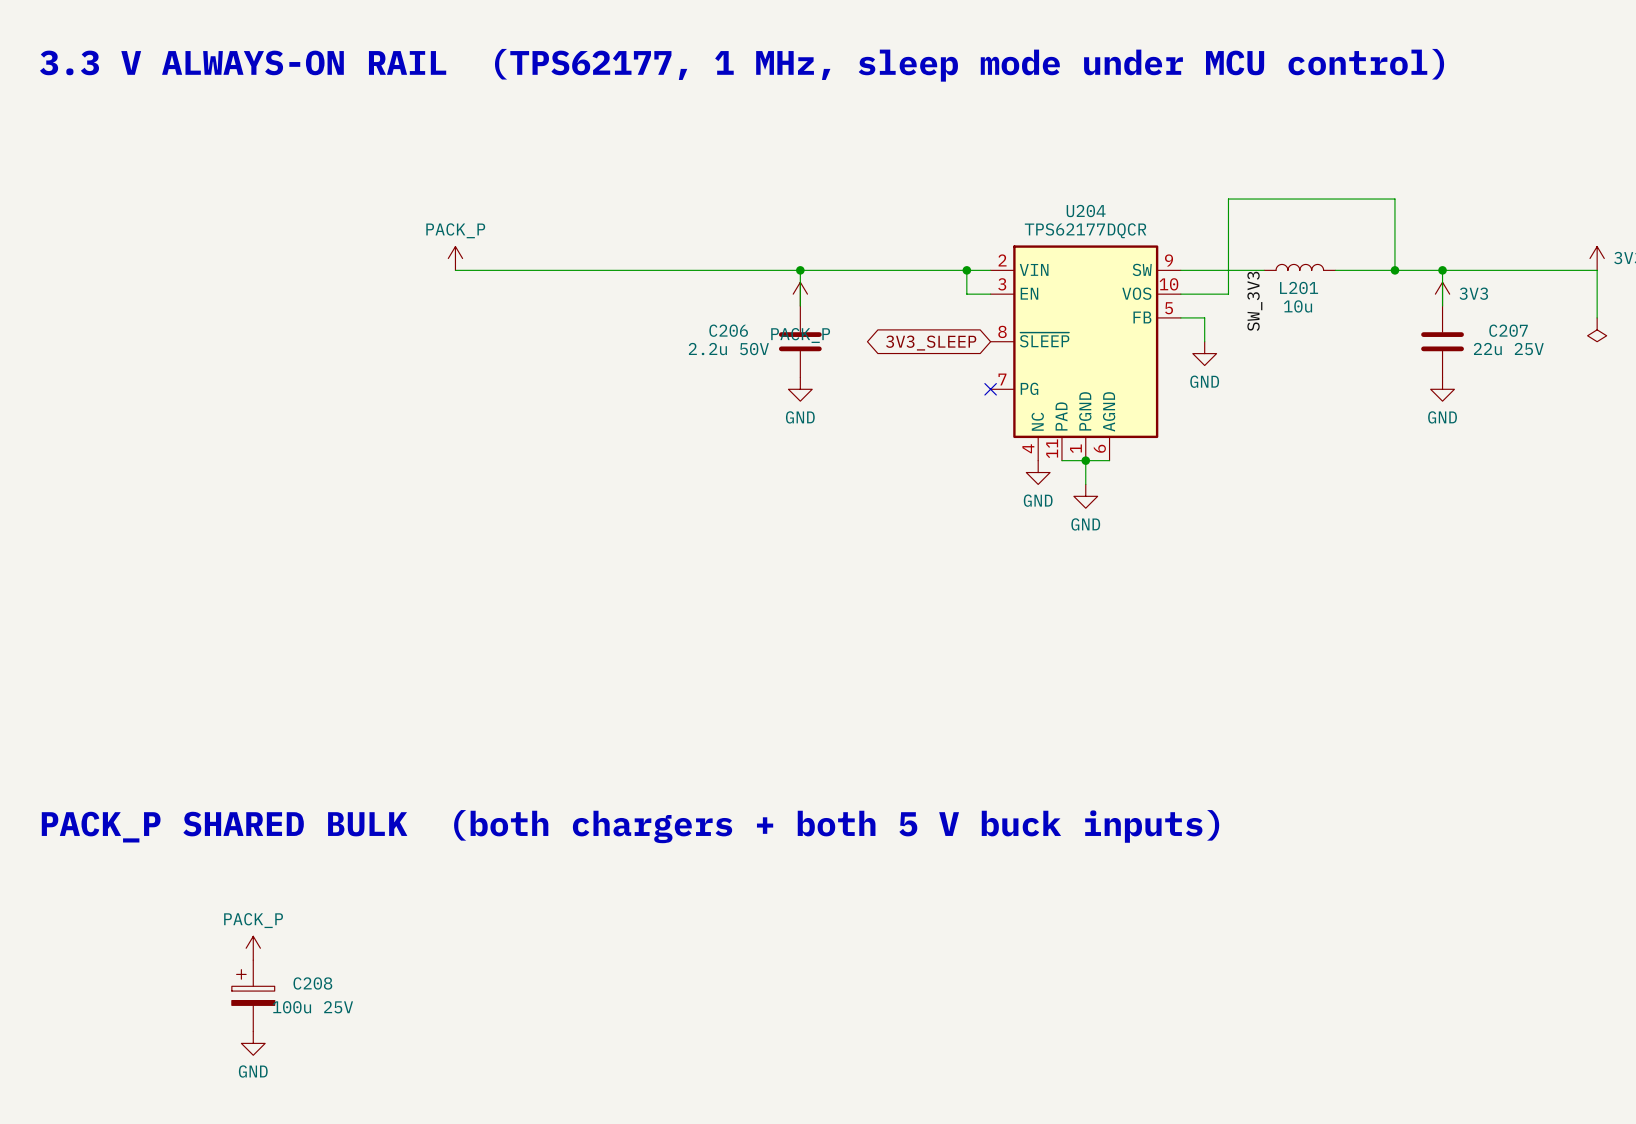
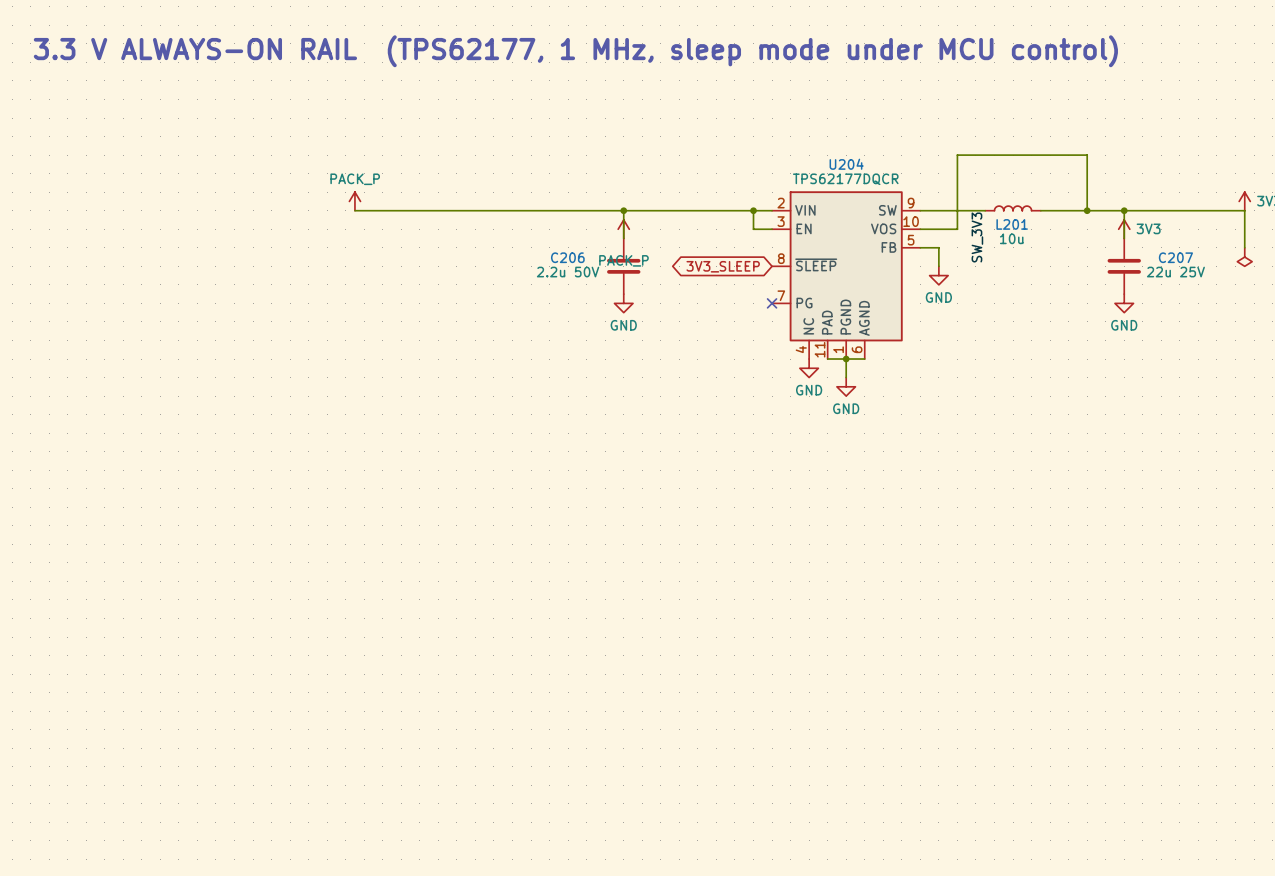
text: PACK_P SHARED BULK (both chargers + both 5 V buck inputs) (630, 826) -> none
power symbol: PACK_P (253, 948) -> none
C208: 100u 25V (253, 995) -> none
power symbol: GND (253, 1043) -> none

